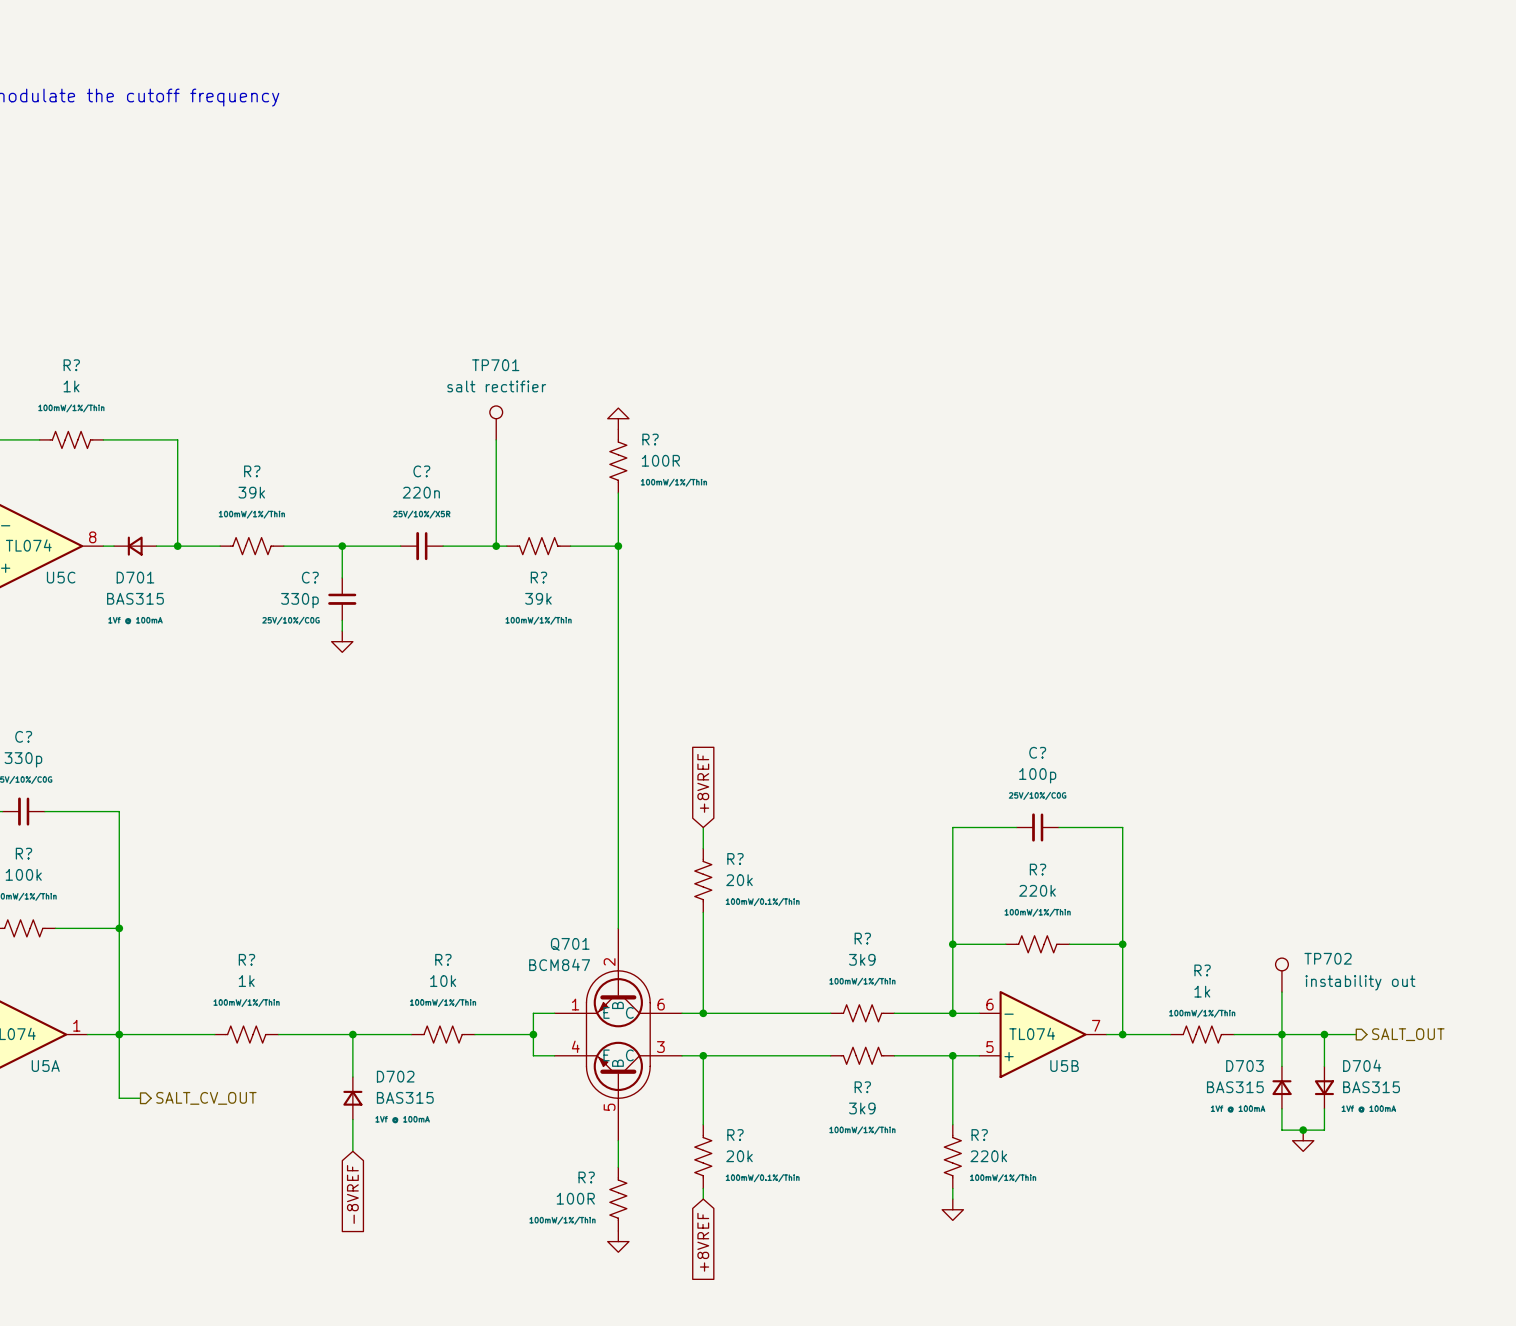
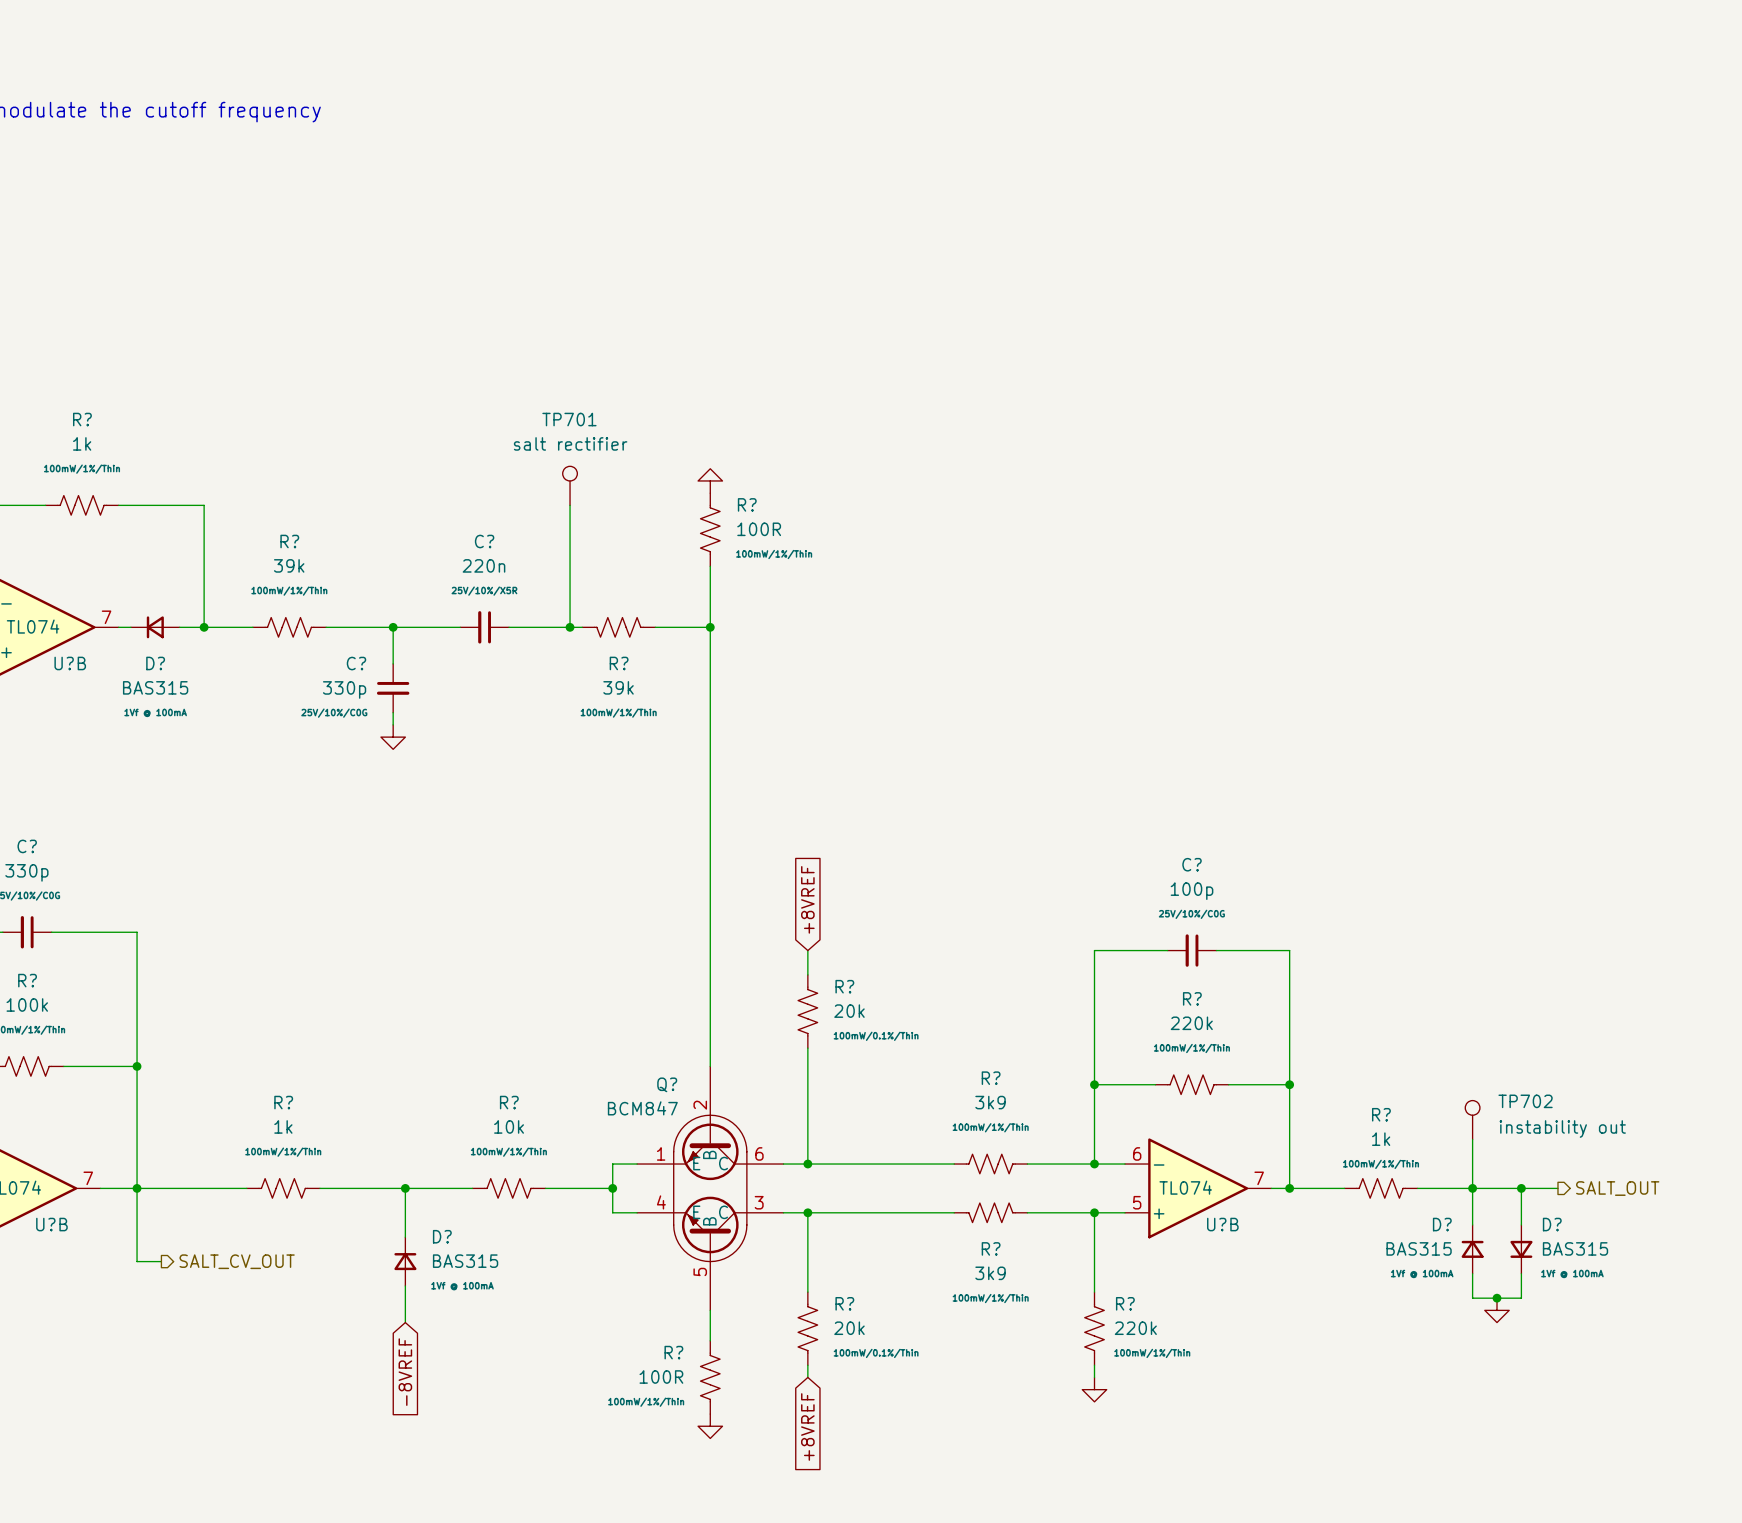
U5C pin number: 8 (92, 537) -> 7 (106, 617)
U5C name: U5C (61, 577) -> U?B (70, 663)
D701 name: D701 (135, 577) -> D? (155, 663)
Q701 name: Q701 (570, 944) -> Q? (667, 1084)
U5A pin number: 1 (76, 1025) -> 7 (88, 1178)
D704 name: D704 (1362, 1065) -> D? (1552, 1224)
U5A name: U5A (45, 1066) -> U?B (51, 1224)
U5B name: U5B (1064, 1066) -> U?B (1222, 1224)
D703 name: D703 (1244, 1066) -> D? (1442, 1224)
D702 name: D702 (395, 1076) -> D? (442, 1236)

